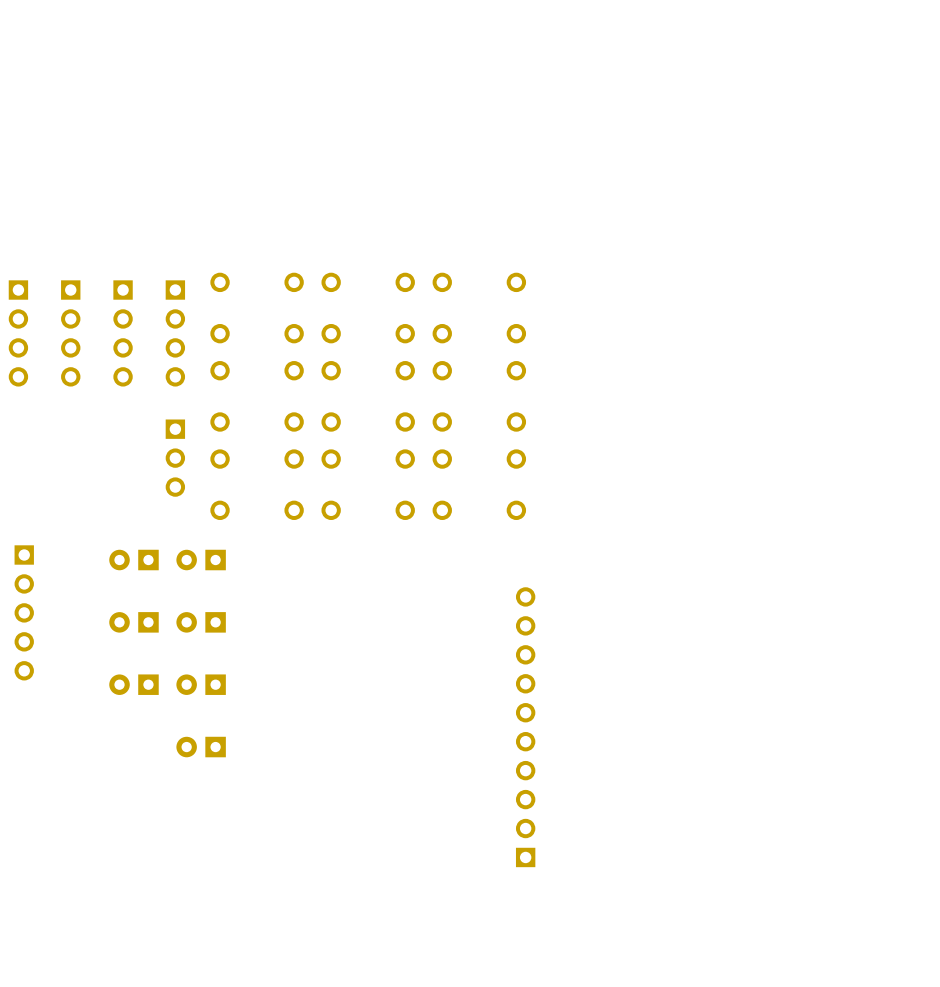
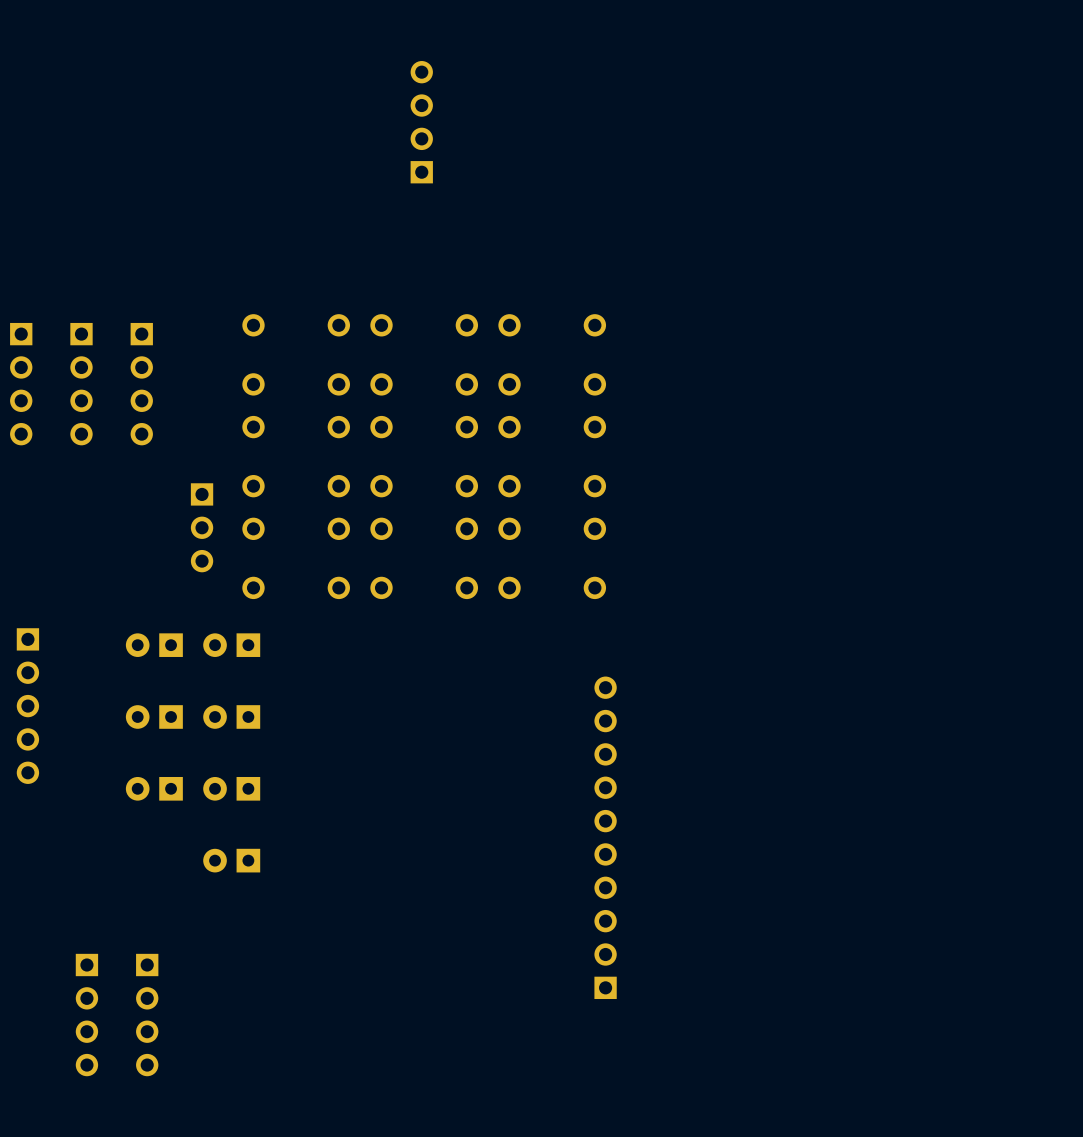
part: none -> (421, 122)
part: (175, 333) -> none
part: none -> (86, 1015)
part: none -> (147, 1015)

